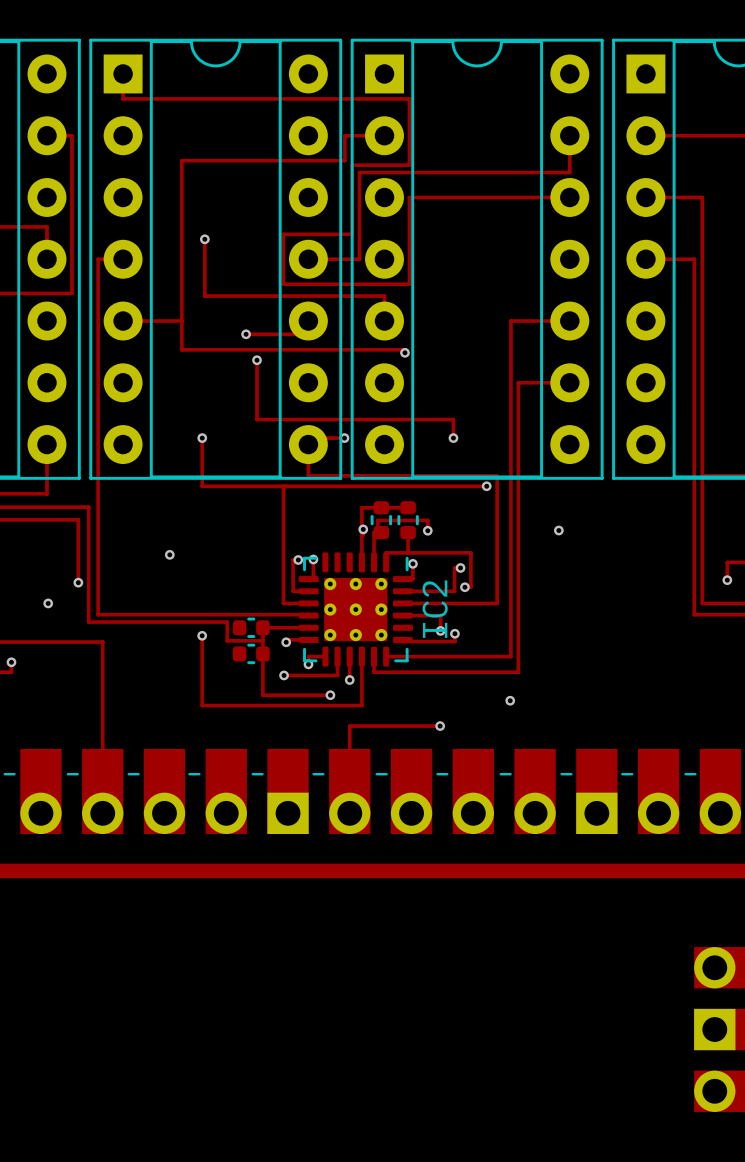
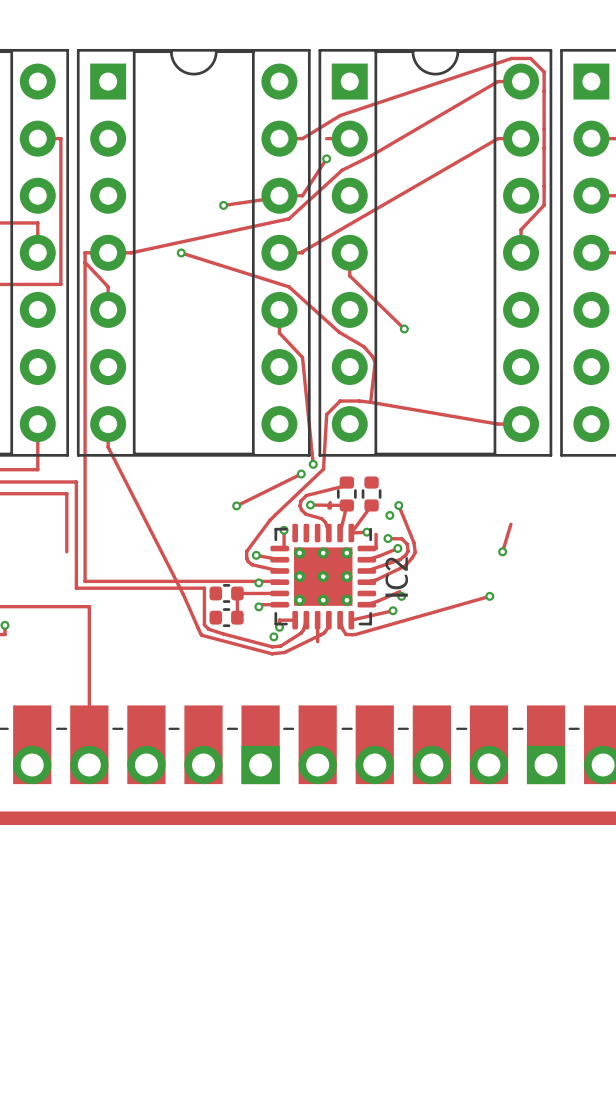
track: (123, 73) (123, 98) (409, 98) (409, 165) (352, 165) (352, 234) (283, 234) (283, 284) (409, 284) (409, 197) (569, 197) -> none
track: none -> (521, 81) (497, 81) (370, 156) (342, 170) (288, 218) (131, 252) (108, 252)
track: none -> (279, 138) (302, 138) (340, 115) (511, 58) (530, 58) (544, 72) (544, 205) (521, 229) (521, 252)
track: (359, 135) (344, 135) (344, 160) (181, 160) (181, 349) (404, 349) (404, 352) -> none
track: (569, 135) (569, 172) (359, 172) (359, 259) (333, 259) -> (521, 138) (497, 138) (302, 252)
track: none -> (326, 158) (302, 195) (279, 195)
via: none -> (326, 158)
track: none -> (290, 195) (223, 205)
via: none -> (223, 205)
track: (204, 239) (204, 296) (384, 296) (384, 321) -> none
via position: (204, 239) -> (181, 252)
track: none -> (181, 252) (288, 286) (339, 332) (364, 346) (372, 356) (375, 362) (370, 402)
track: none -> (349, 252) (349, 275) (404, 329)
track: (123, 321) (181, 321) -> (108, 309) (108, 286) (85, 262)
track: (569, 321) (510, 321) (510, 656) (386, 656) -> (393, 610) (351, 620)
track: (246, 334) (308, 334) -> (313, 464) (302, 357) (279, 333) (279, 322)
via: (246, 334) -> none
via position: (404, 352) -> (404, 329)
track: (257, 360) (257, 419) (374, 419) -> none
via: (257, 360) -> none
track: (569, 382) (518, 382) (518, 672) (374, 672) (374, 656) -> (489, 596) (355, 634) (346, 634) (340, 620)
track: (394, 419) (453, 419) (453, 438) -> (359, 401) (370, 402)
track: none -> (370, 402) (497, 424) (521, 424)
track: (202, 438) (202, 486) (486, 486) -> none
via: (202, 438) -> none
track: (344, 438) (308, 438) (308, 475) (497, 475) (497, 603) (402, 603) -> (407, 545) (408, 551) (399, 559) (366, 570)
via: (344, 438) -> none
via: (453, 438) -> none
track: (283, 486) (283, 603) (308, 603) -> (340, 401) (326, 414) (323, 469) (269, 520) (246, 551) (246, 559) (252, 564) (279, 570)
via: (486, 486) -> none
via: none -> (313, 464)
track: none -> (301, 474) (236, 505)
via: none -> (301, 474)
track: (408, 507) (361, 507) (361, 562) -> (347, 485) (306, 495) (301, 500) (301, 509) (305, 514) (321, 518) (325, 522) (328, 533)
via position: (363, 529) -> (310, 505)
track: (427, 530) (427, 520) (377, 520) (377, 532) -> none
via: (427, 530) -> none
via: (558, 530) -> none
track: (381, 532) (374, 532) (374, 562) -> (310, 505) (346, 505) (340, 533)
track: (408, 532) (408, 552) -> (371, 505) (351, 533) (366, 532)
via: none -> (398, 505)
via: none -> (236, 505)
via: none -> (389, 515)
track: none -> (510, 524) (502, 551)
via: (169, 554) -> none
track: (298, 559) (293, 559) (293, 591) (308, 591) -> (256, 555) (279, 559)
via: (298, 559) -> none
via: none -> (366, 532)
track: (386, 562) (386, 552) (470, 552) (470, 587) (464, 587) -> none
via: (412, 563) -> none
track: (460, 567) (454, 567) (454, 591) (402, 591) -> (397, 548) (366, 559)
via: (460, 567) -> none
track: none -> (387, 538) (401, 538) (407, 544)
via: none -> (387, 538)
via: none -> (397, 548)
via: (78, 582) -> none
via: none -> (502, 551)
via: none -> (256, 555)
via: (464, 587) -> none
via: (48, 603) -> none
track: (402, 615) (440, 615) (440, 630) -> (366, 582) (376, 579) (404, 566) (415, 552) (413, 542) (398, 505)
via: none -> (258, 582)
via: none -> (489, 596)
track: (454, 633) (454, 641) (402, 641) (402, 639) -> (399, 591) (366, 604)
via position: (454, 633) -> (393, 610)
track: (202, 635) (202, 705) (361, 705) (361, 656) -> (108, 424) (108, 447) (183, 594) (201, 635) (271, 653) (284, 652) (324, 632) (328, 627) (328, 620)
via: (202, 635) -> none
track: (227, 640) (262, 640) -> none
track: (262, 653) (262, 695) (330, 695) -> none
track: (337, 656) (337, 675) (284, 675) -> (306, 620) (301, 633) (280, 646) (272, 646) (208, 629) (204, 624) (204, 605)
via: none -> (273, 636)
via: (284, 675) -> none
via: (349, 680) -> none
via: (330, 695) -> none
via: (510, 700) -> none
track: (440, 726) (349, 726) (349, 813) -> none
via: (440, 726) -> none

